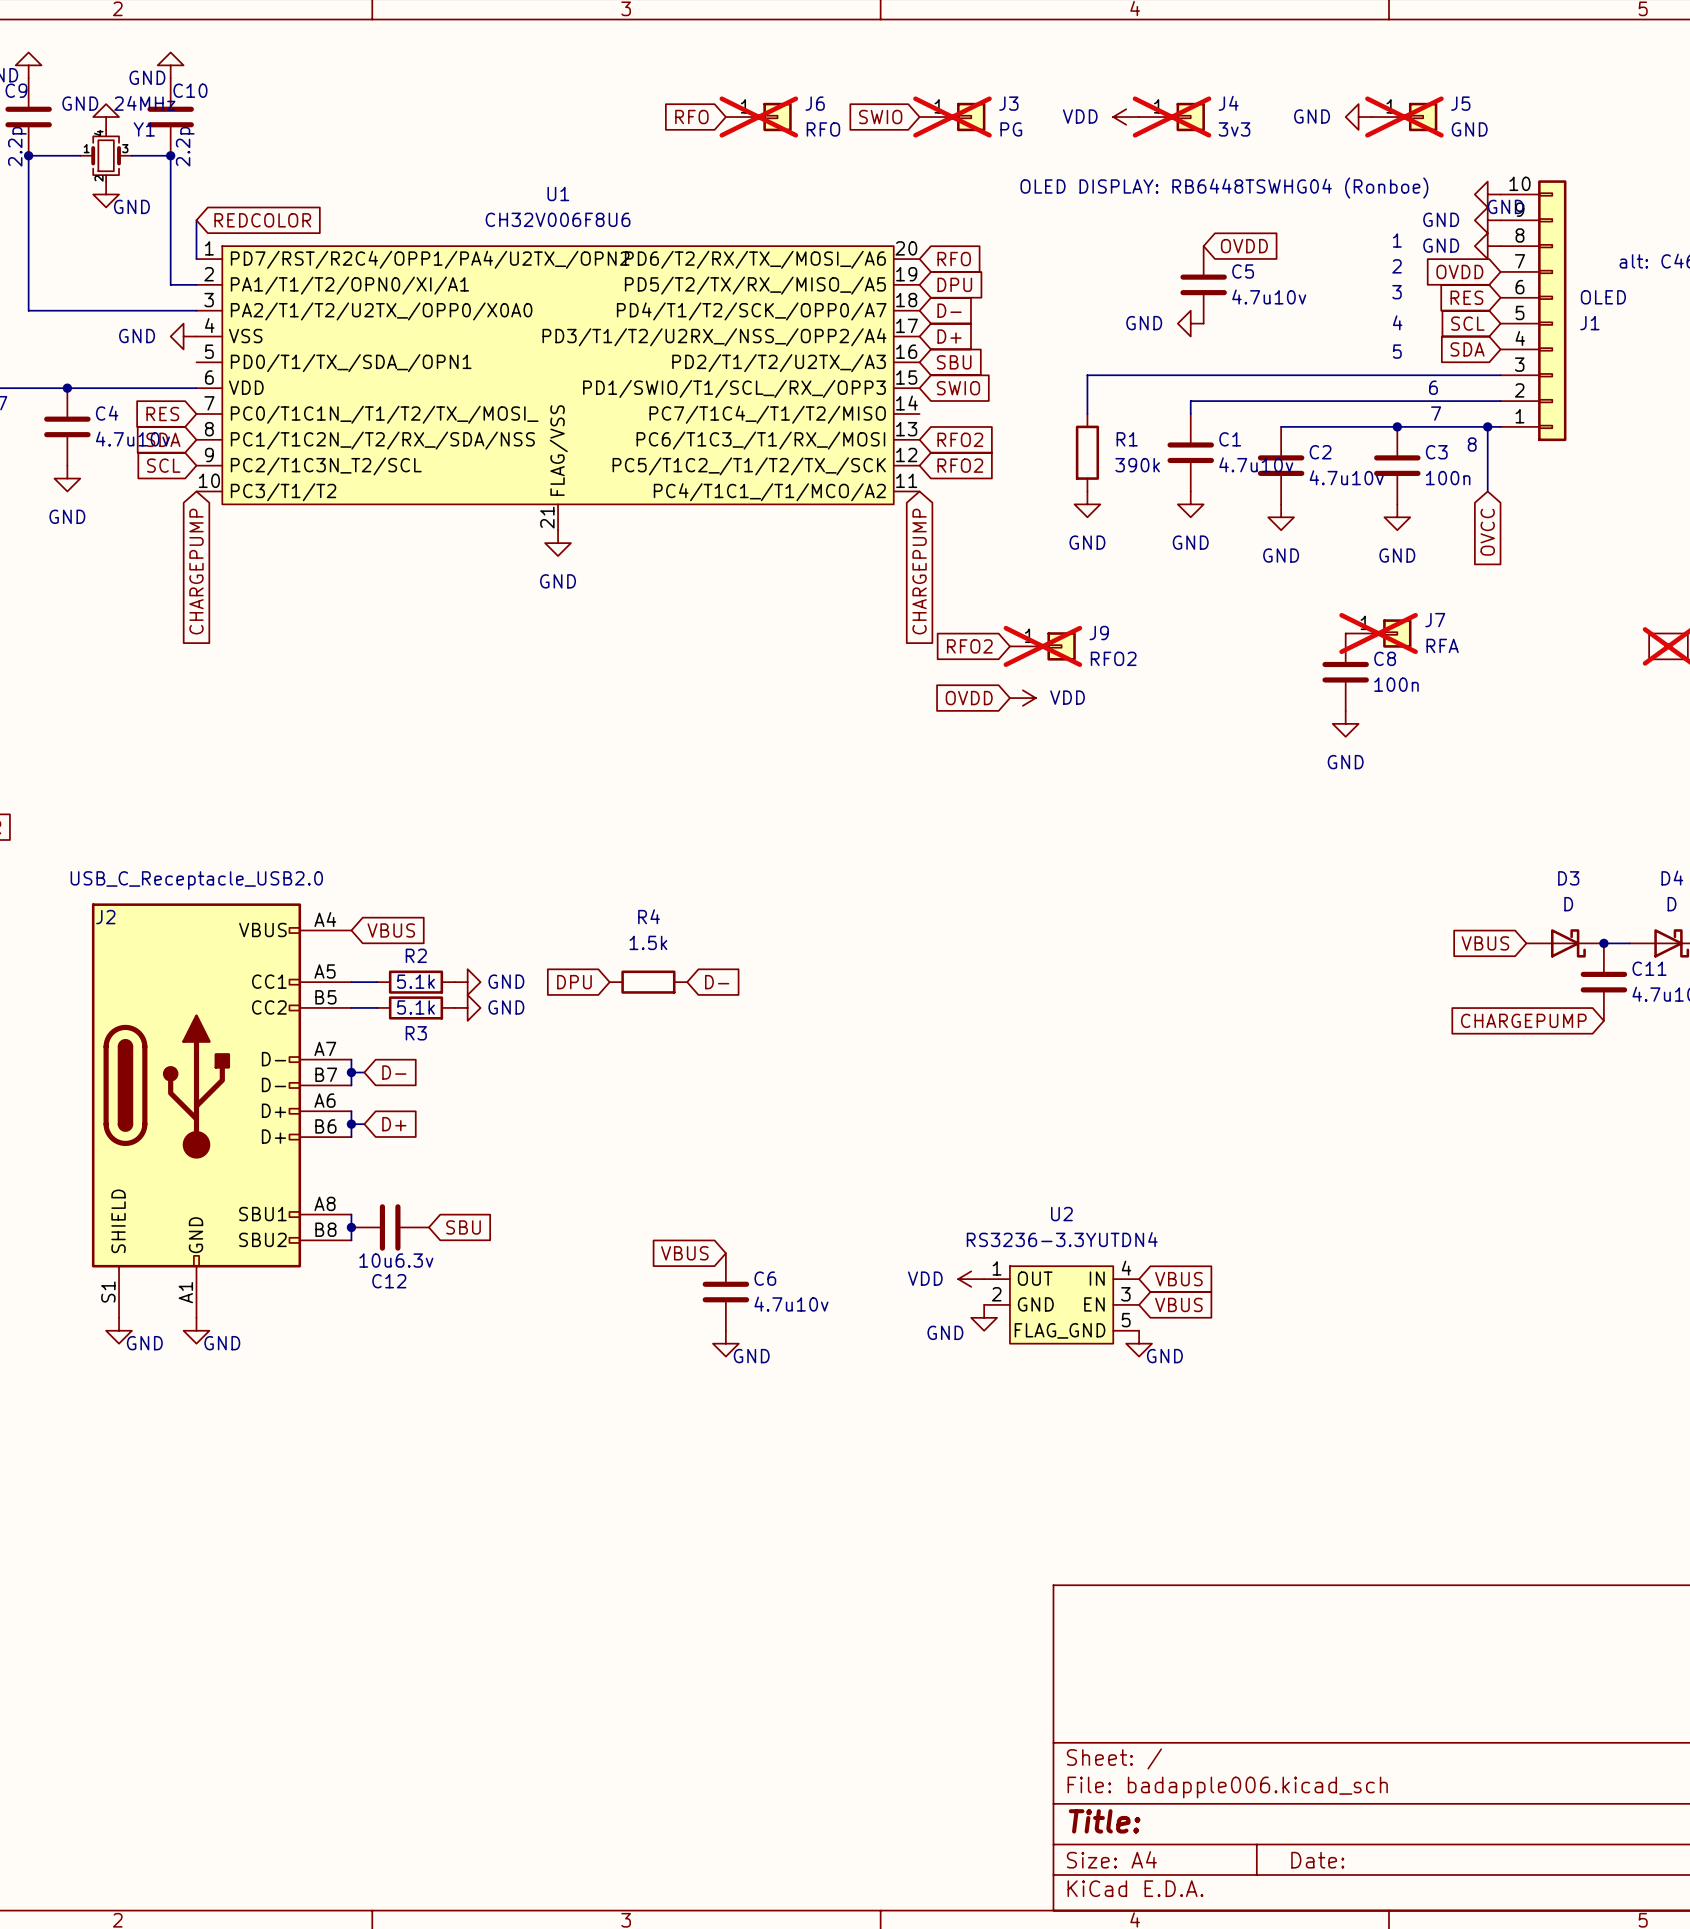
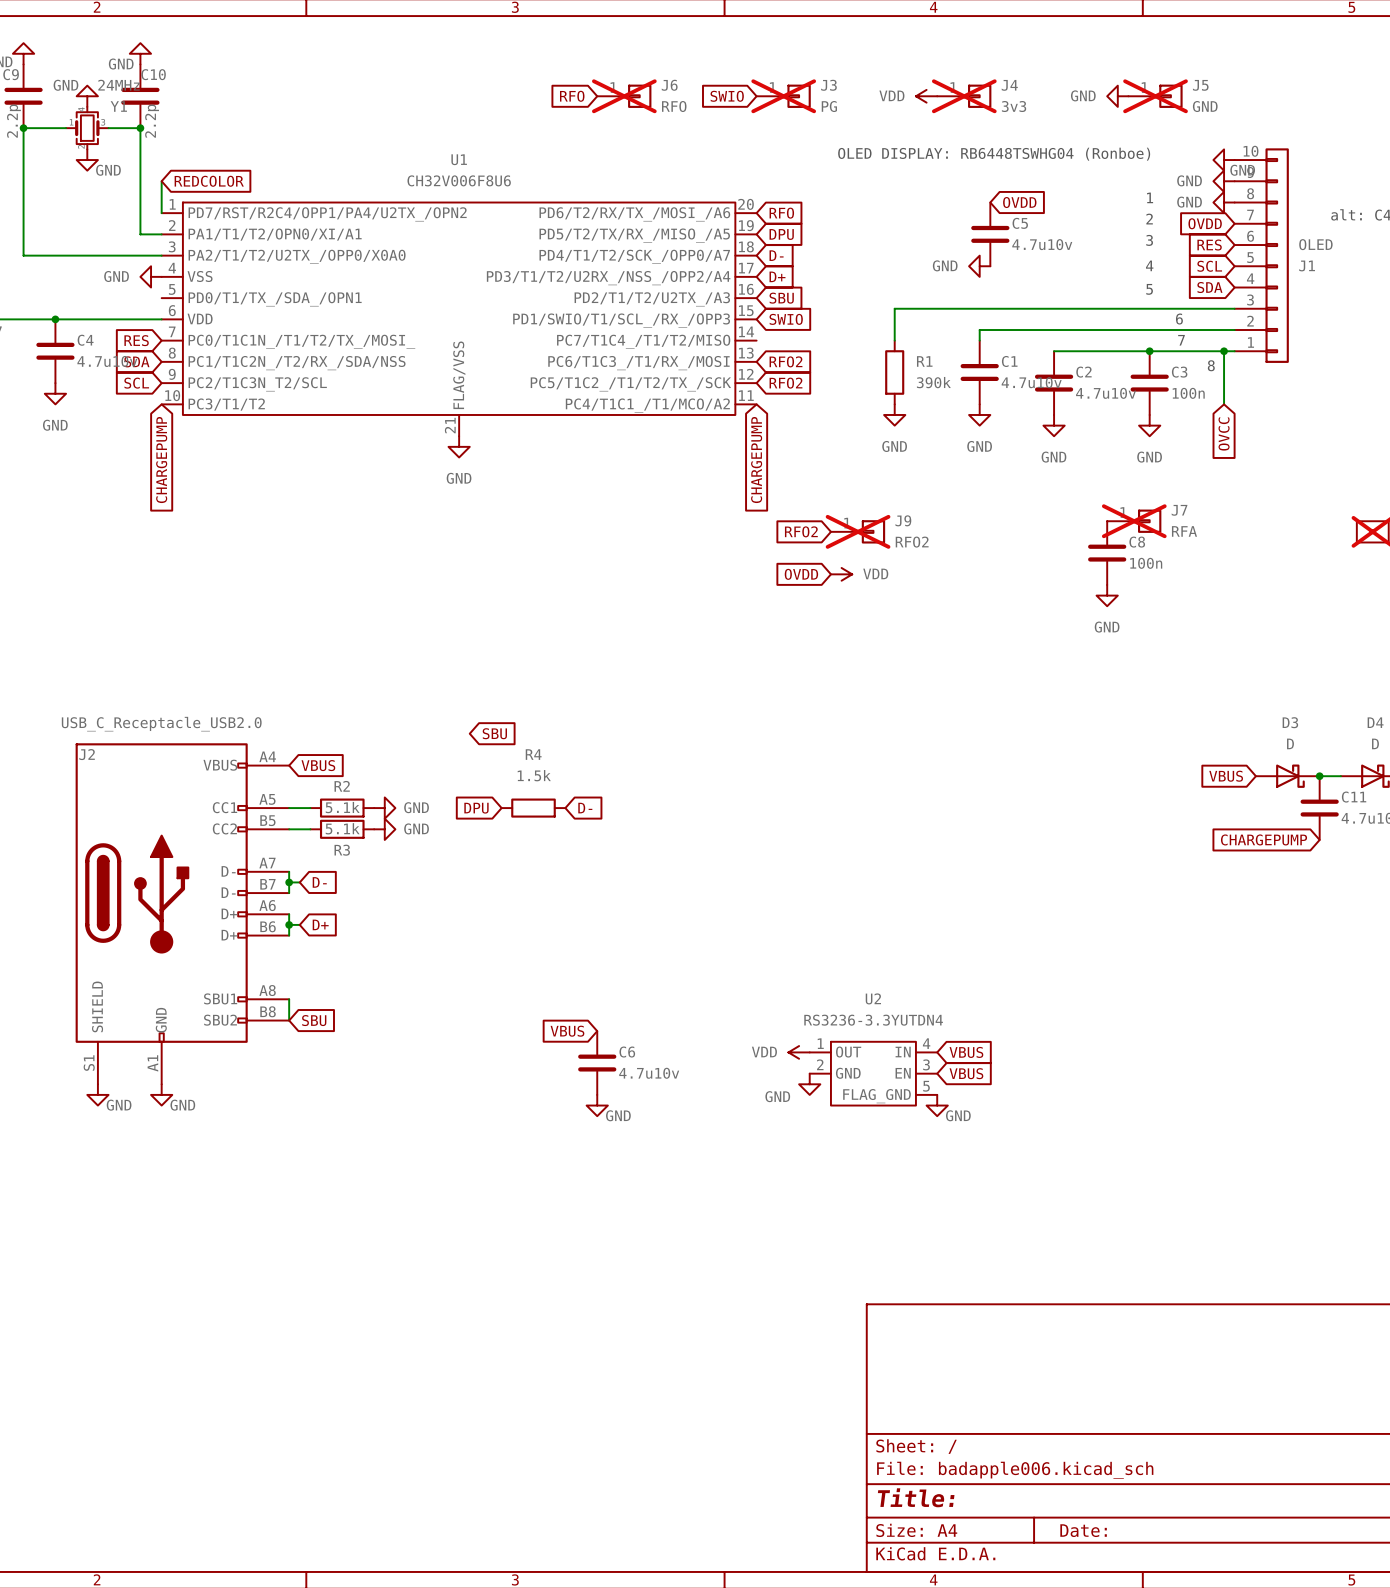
global label: none -> SBU (494, 733)
junction: (351, 1227) -> none
C12: 10u6.3v (390, 1227) -> none
global label position: SBU (463, 1227) -> SBU (314, 1020)

